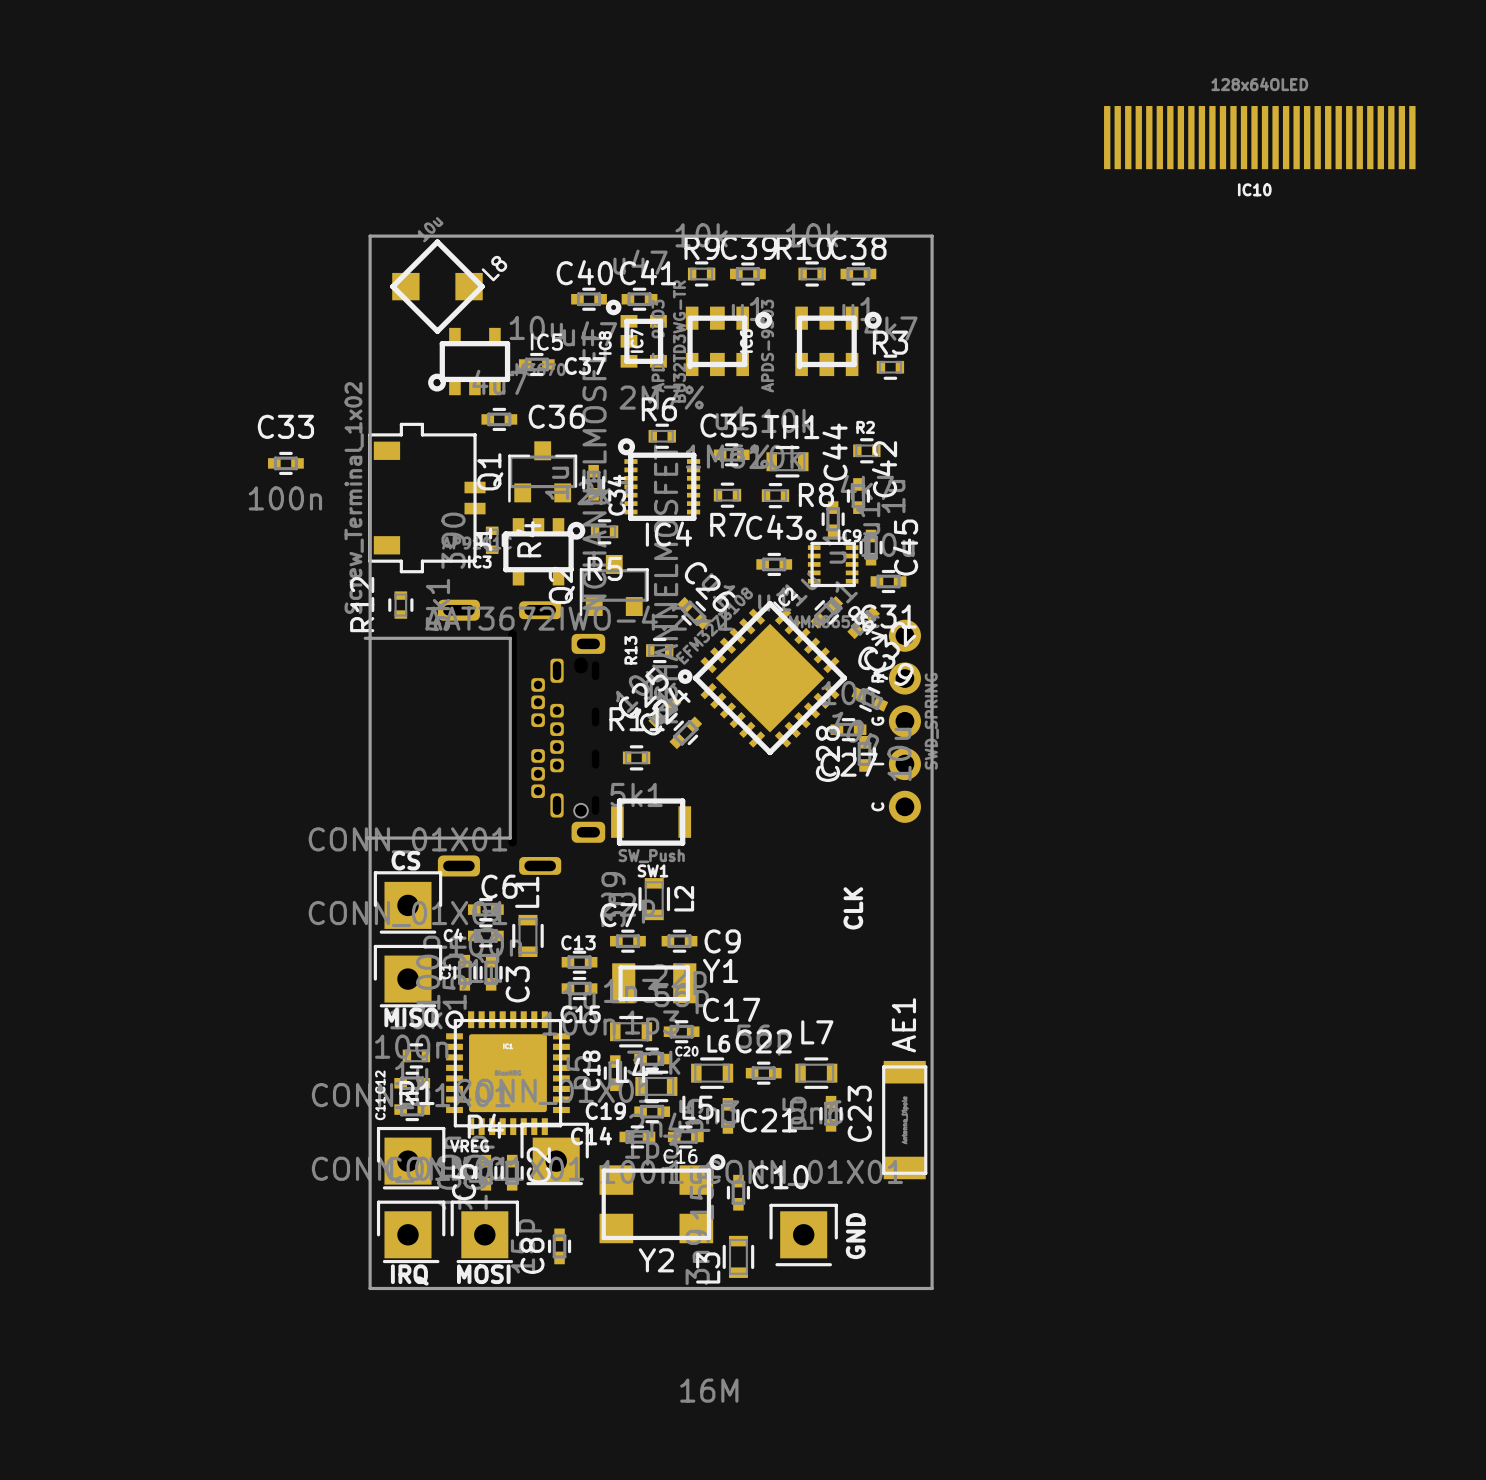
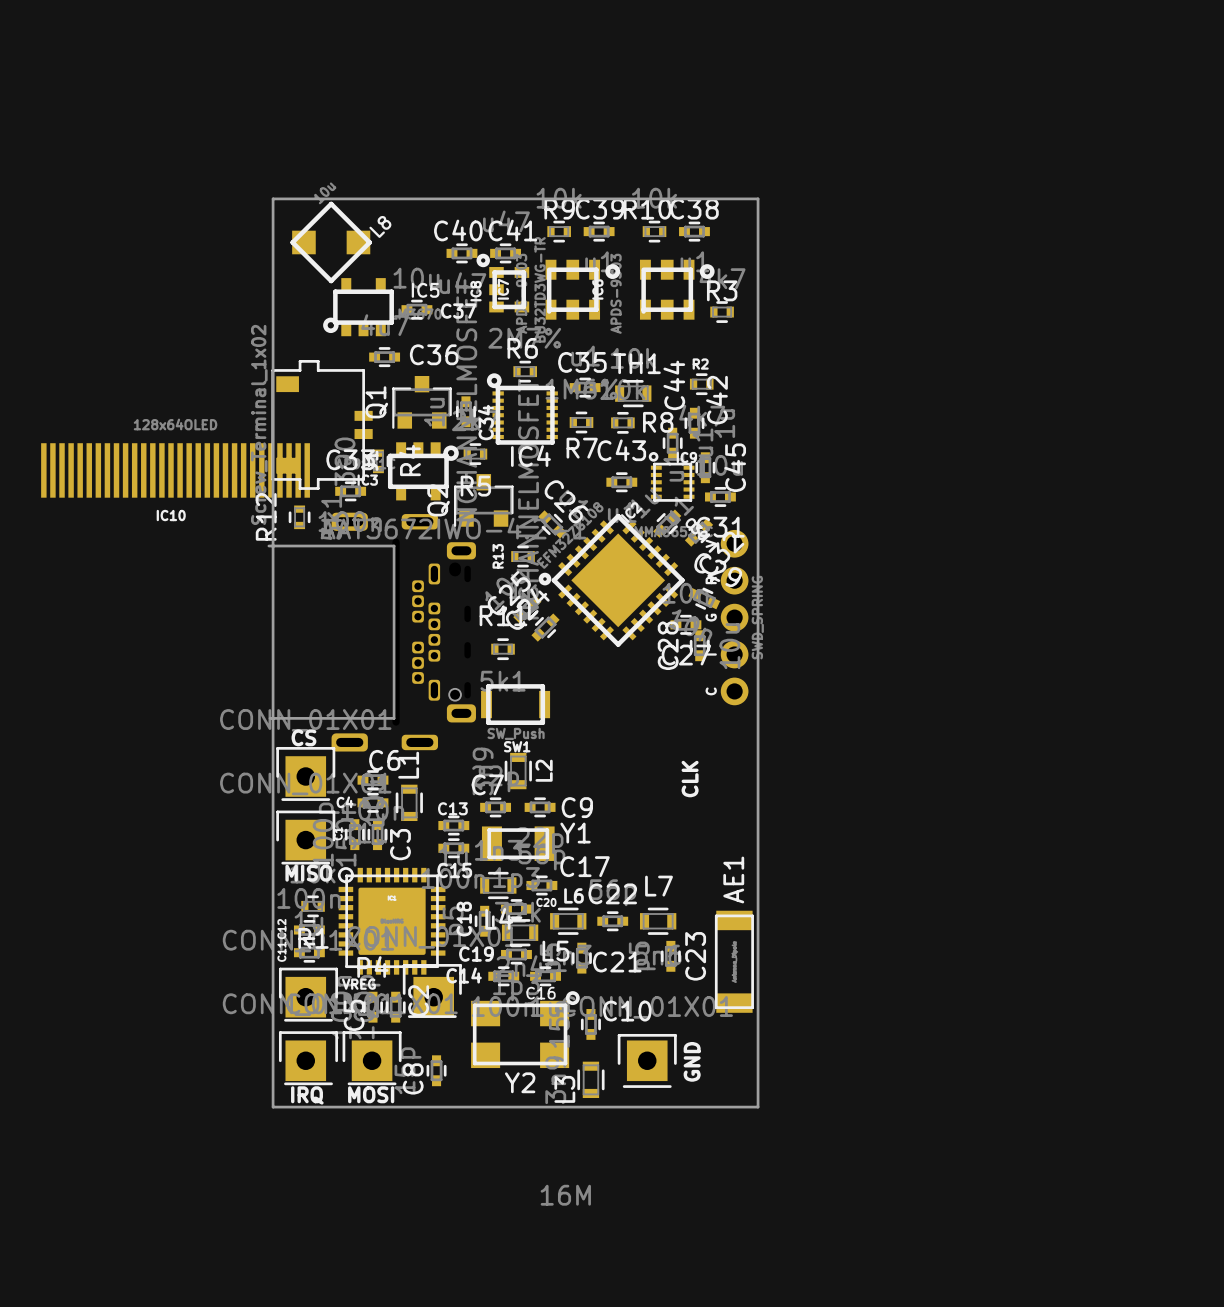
IC10 position: (1259, 137) -> (175, 470)
C33 position: (285, 463) -> (350, 491)

